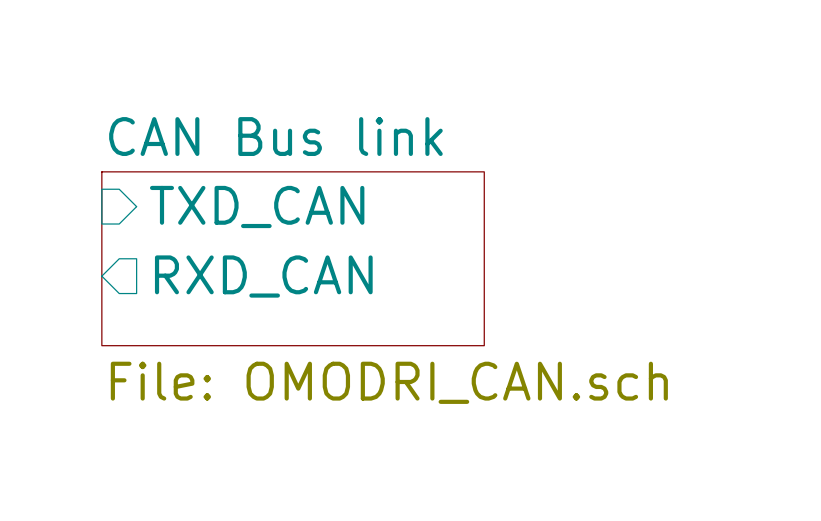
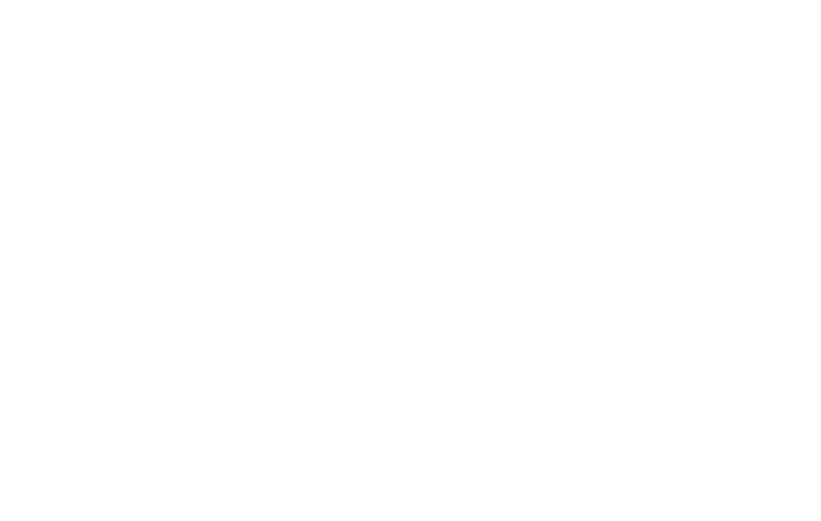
sheet pin: TXD_CAN (257, 206) -> none
sheet CAN Bus link: File: OMODRI_CAN.sch (293, 258) -> none
sheet pin: RXD_CAN (263, 276) -> none

